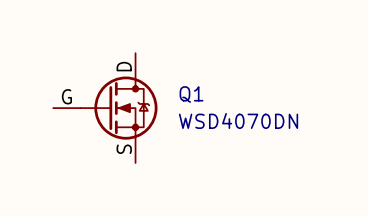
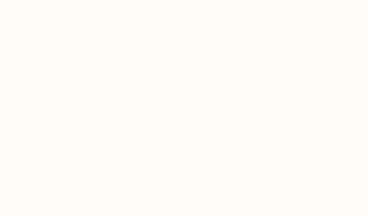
Q1: WSD4070DN (105, 108) -> none

